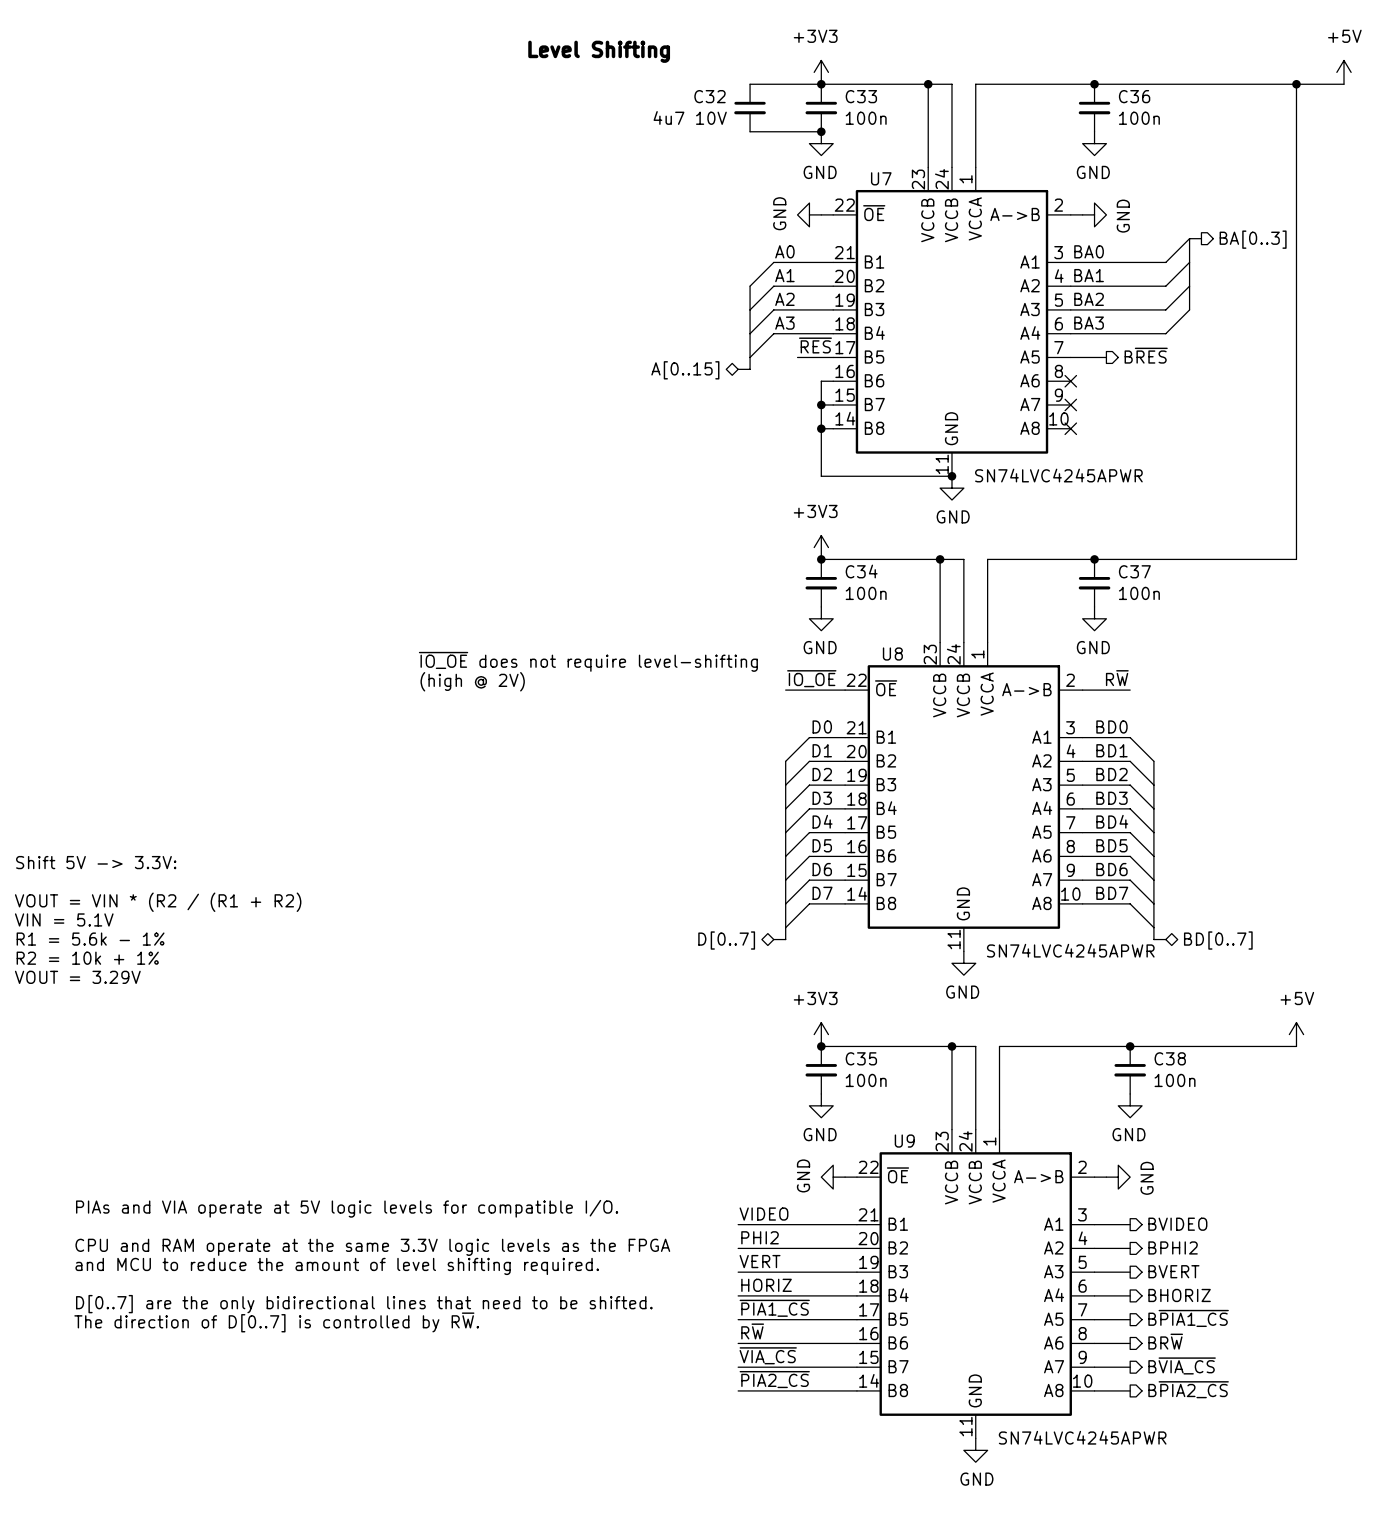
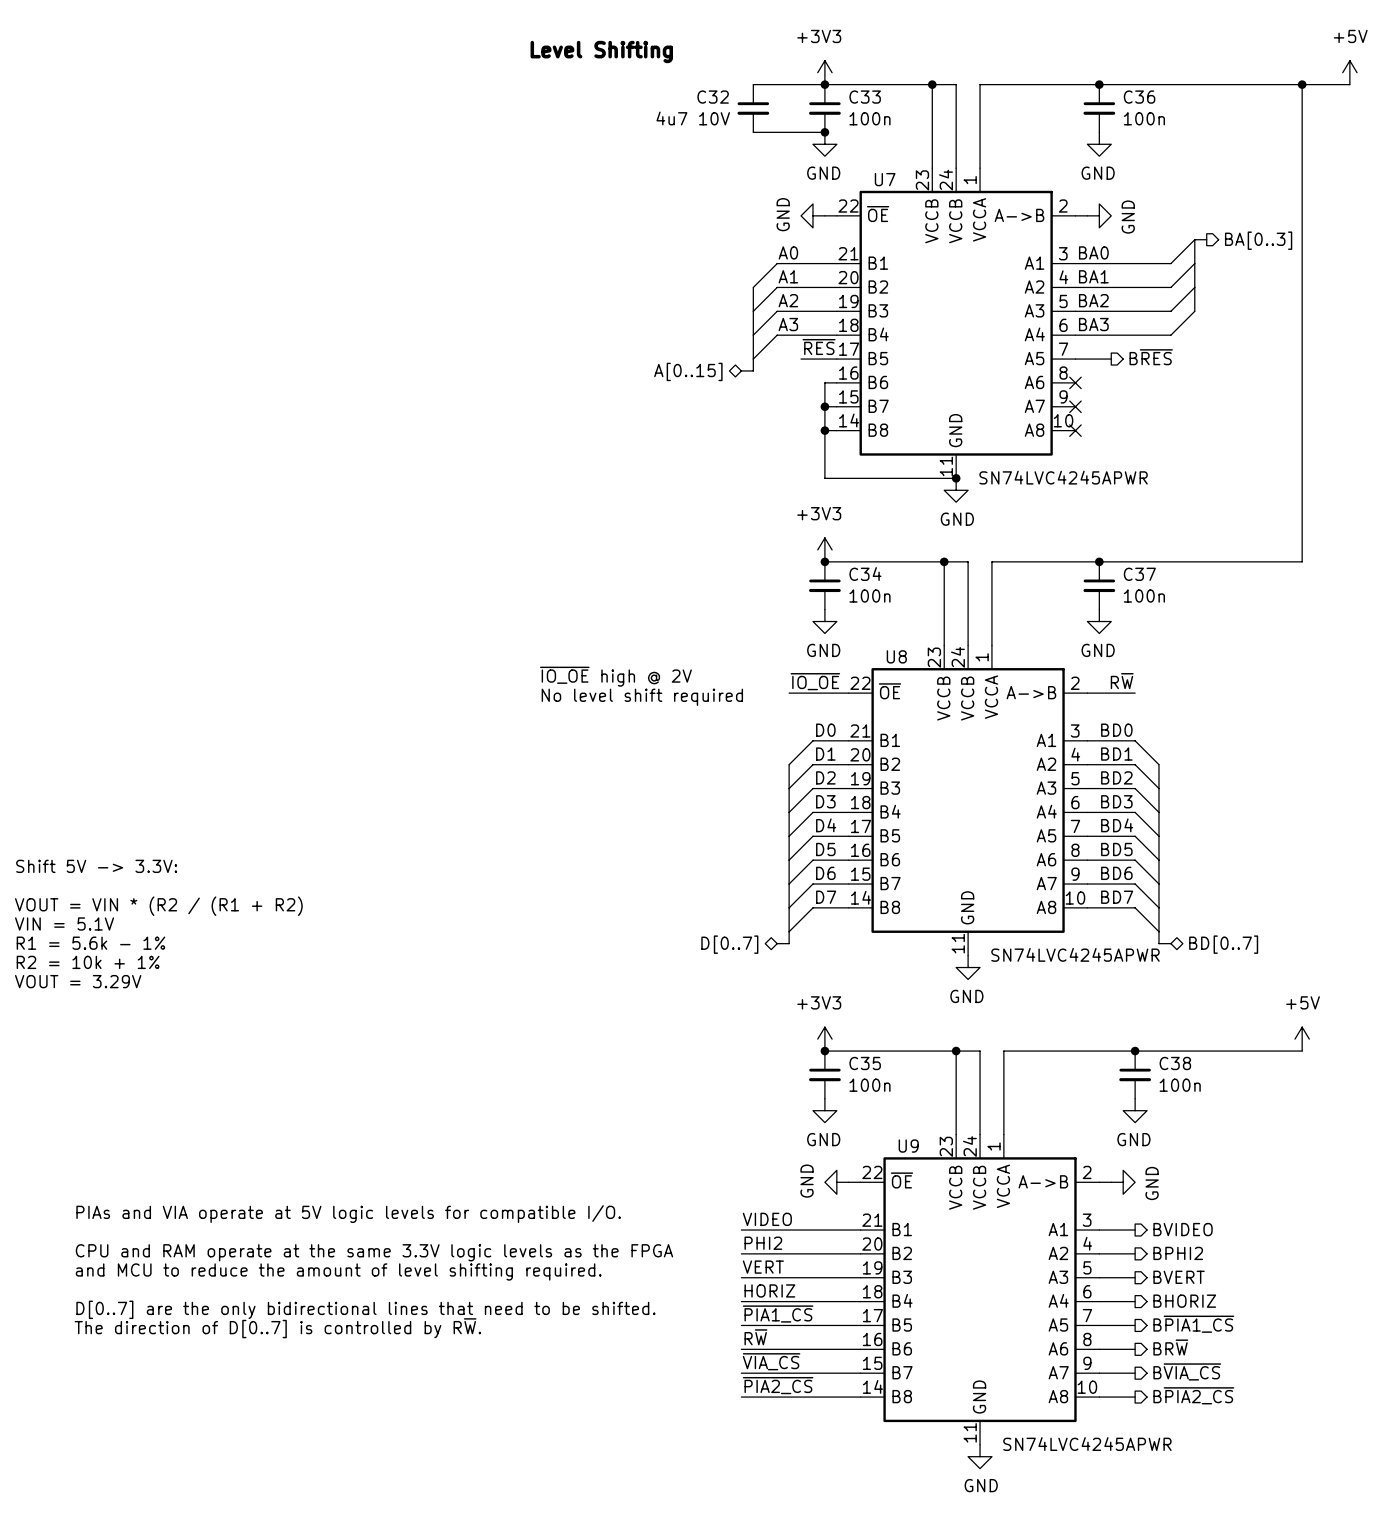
text: ~{IO_OE} does not require level-shifting (588, 661) -> none
text: (high @ 2V) (472, 681) -> ~{IO_OE} high @ 2V (615, 676)
text: none -> No level shift required (642, 697)

